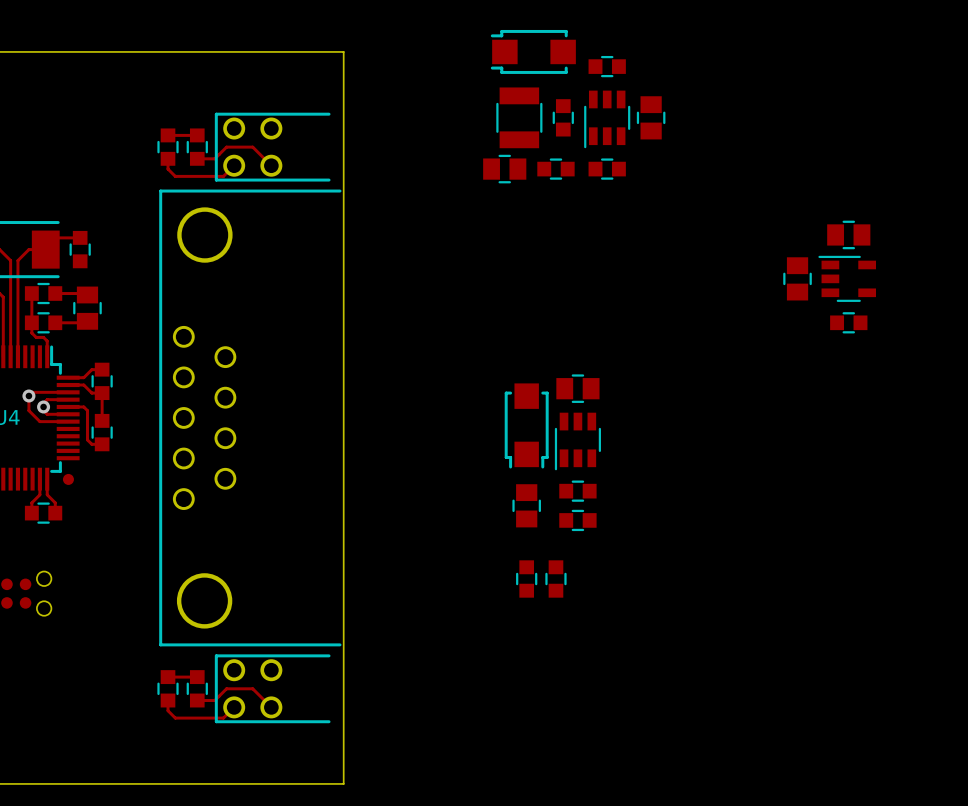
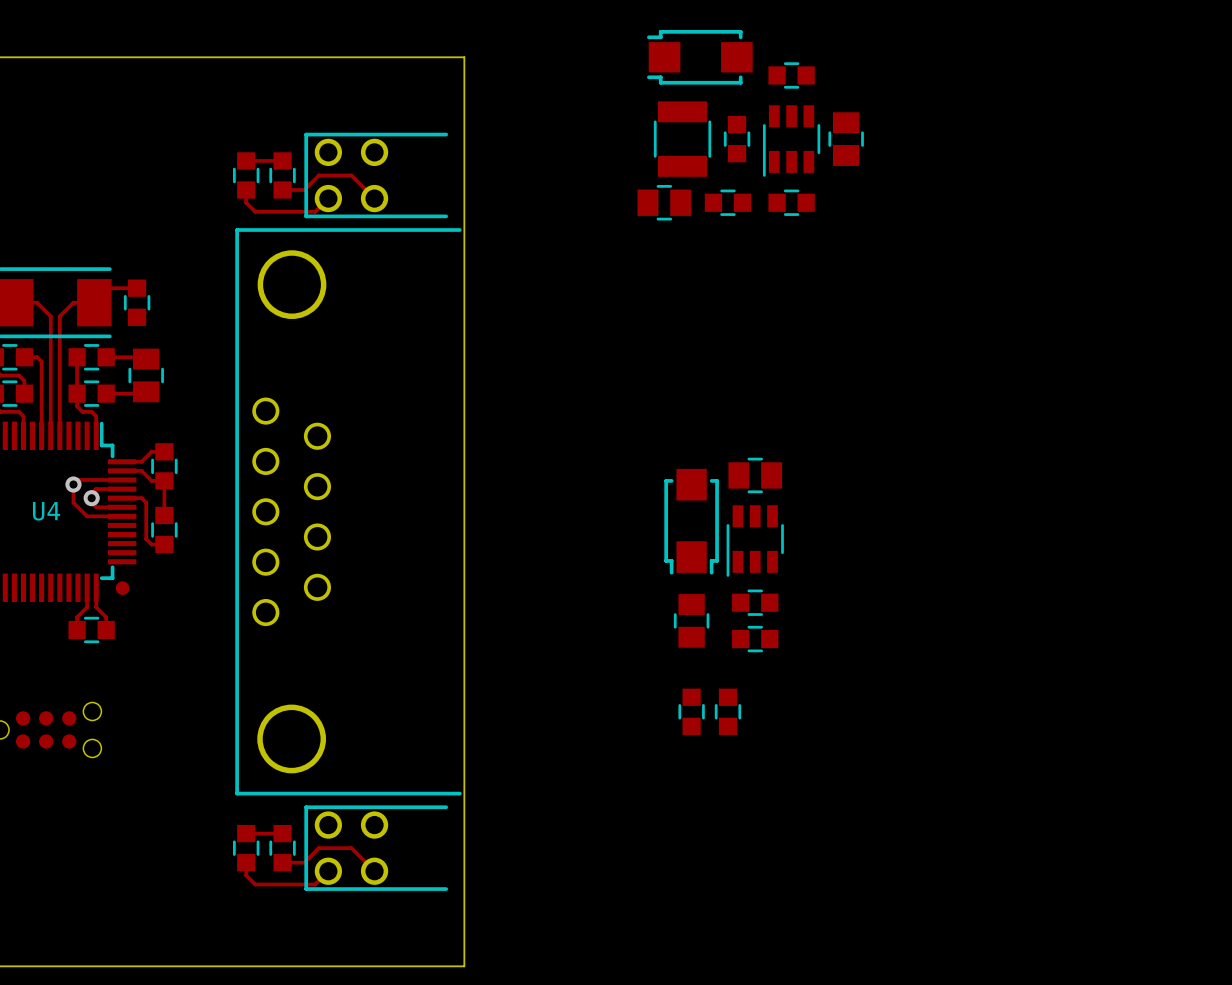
part: (848, 234) -> none
part: (797, 278) -> none
part: (847, 278) -> none
part: (848, 322) -> none

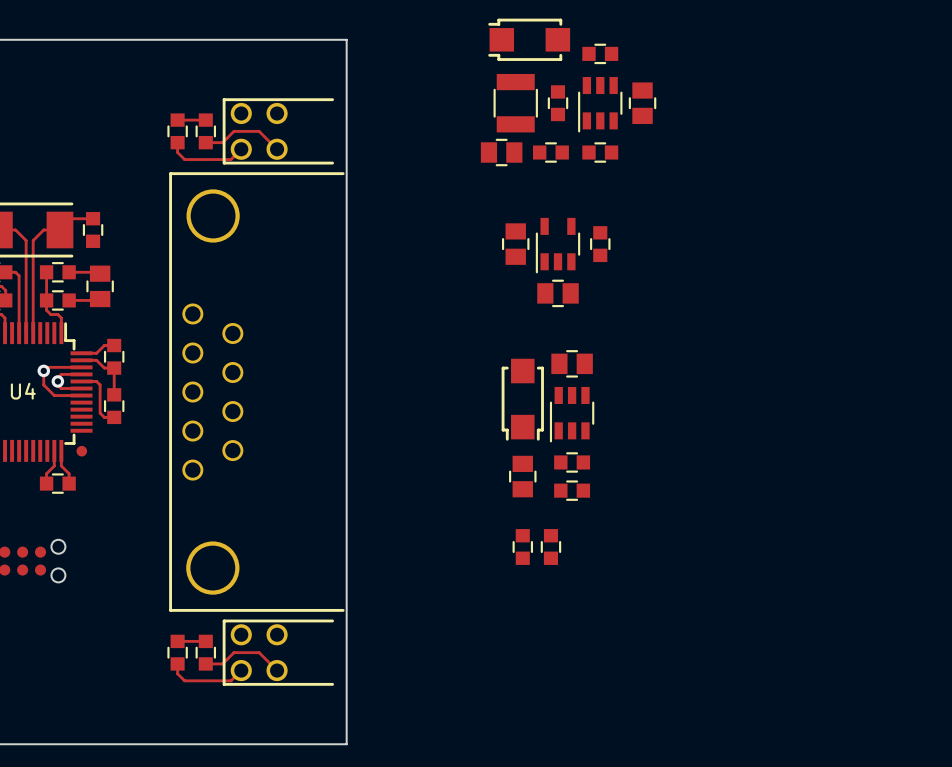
part: none -> (515, 244)
part: none -> (600, 244)
part: none -> (558, 245)
part: none -> (558, 293)

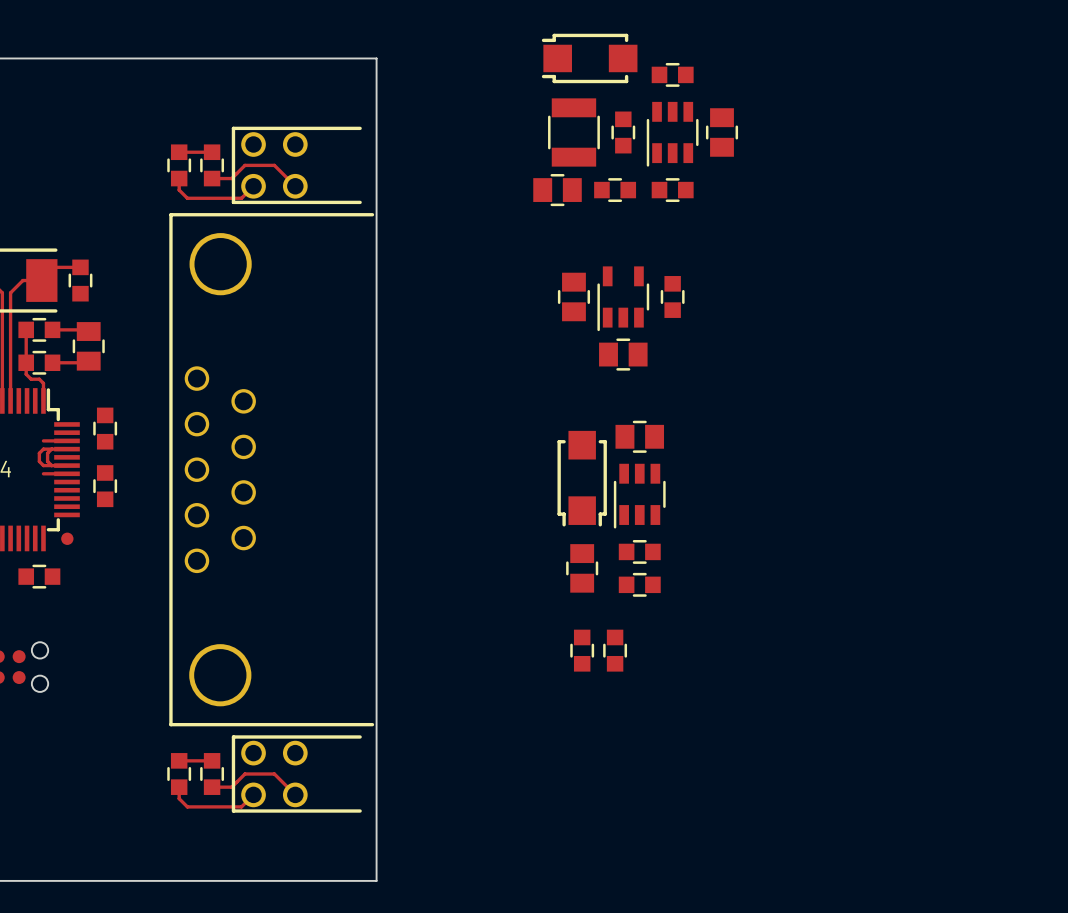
top track: (114, 345) (104, 345) (96, 353) (81, 353) -> none
top track: (81, 360) (96, 360) (104, 368) (114, 368) (114, 394) -> none
top track: (61, 367) (47, 367) (43, 370) (43, 384) (54, 395) (61, 395) -> none
via: (43, 370) -> none
top track: none -> (51, 449) (47, 453) (47, 461) (51, 465)
via: (57, 381) -> none
top track: (81, 381) (96, 381) (100, 384) (100, 413) (104, 417) (114, 417) -> none
top track: (54, 450) (54, 465) (46, 473) (46, 483) -> none
top track: (61, 450) (61, 465) (69, 473) (69, 483) -> none

